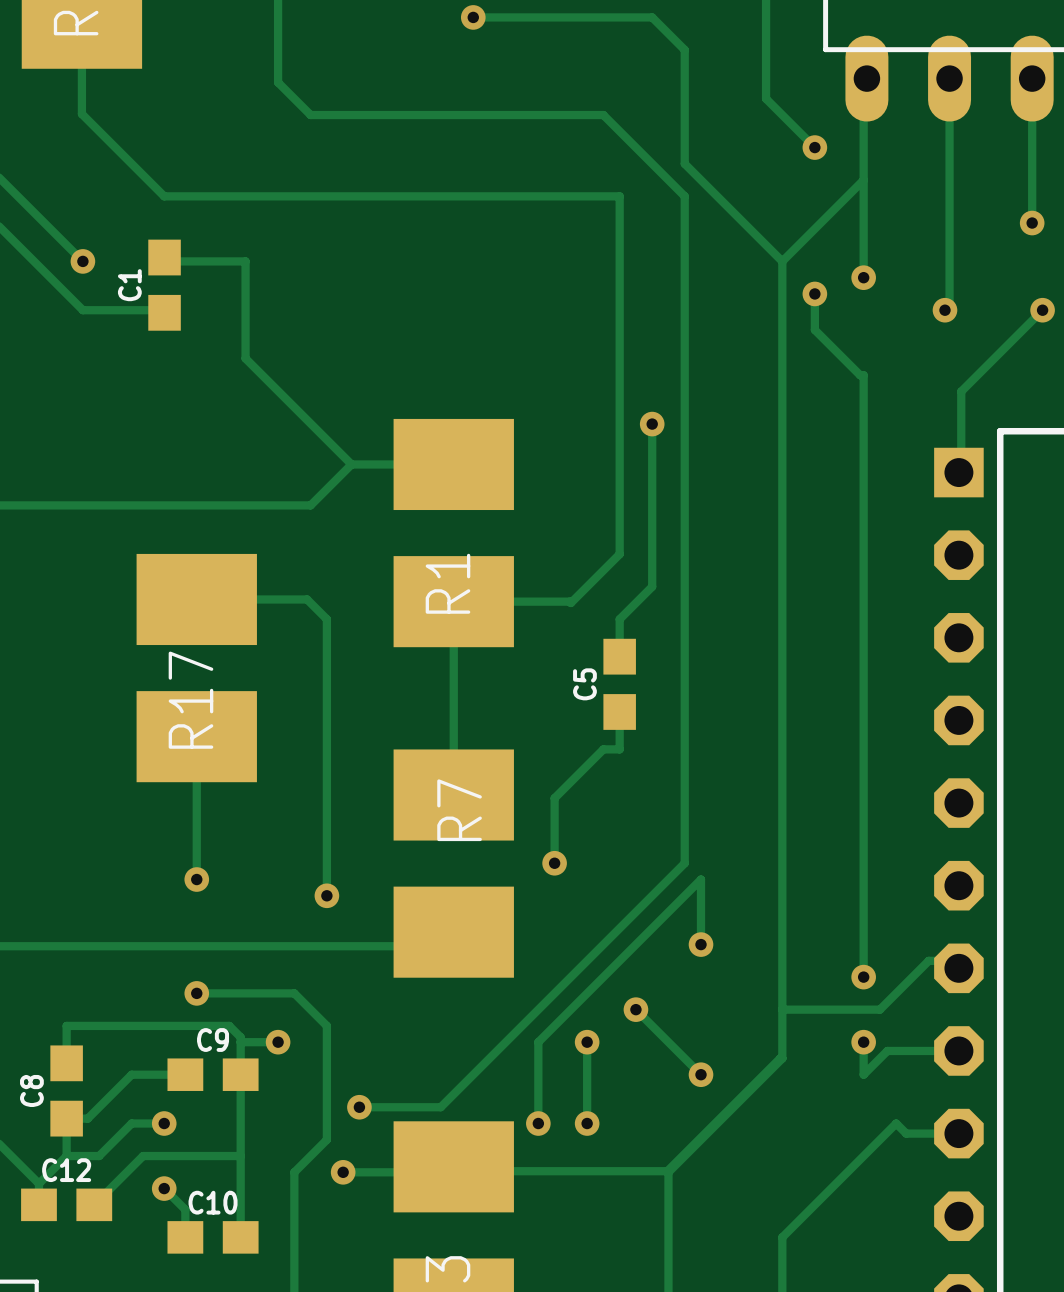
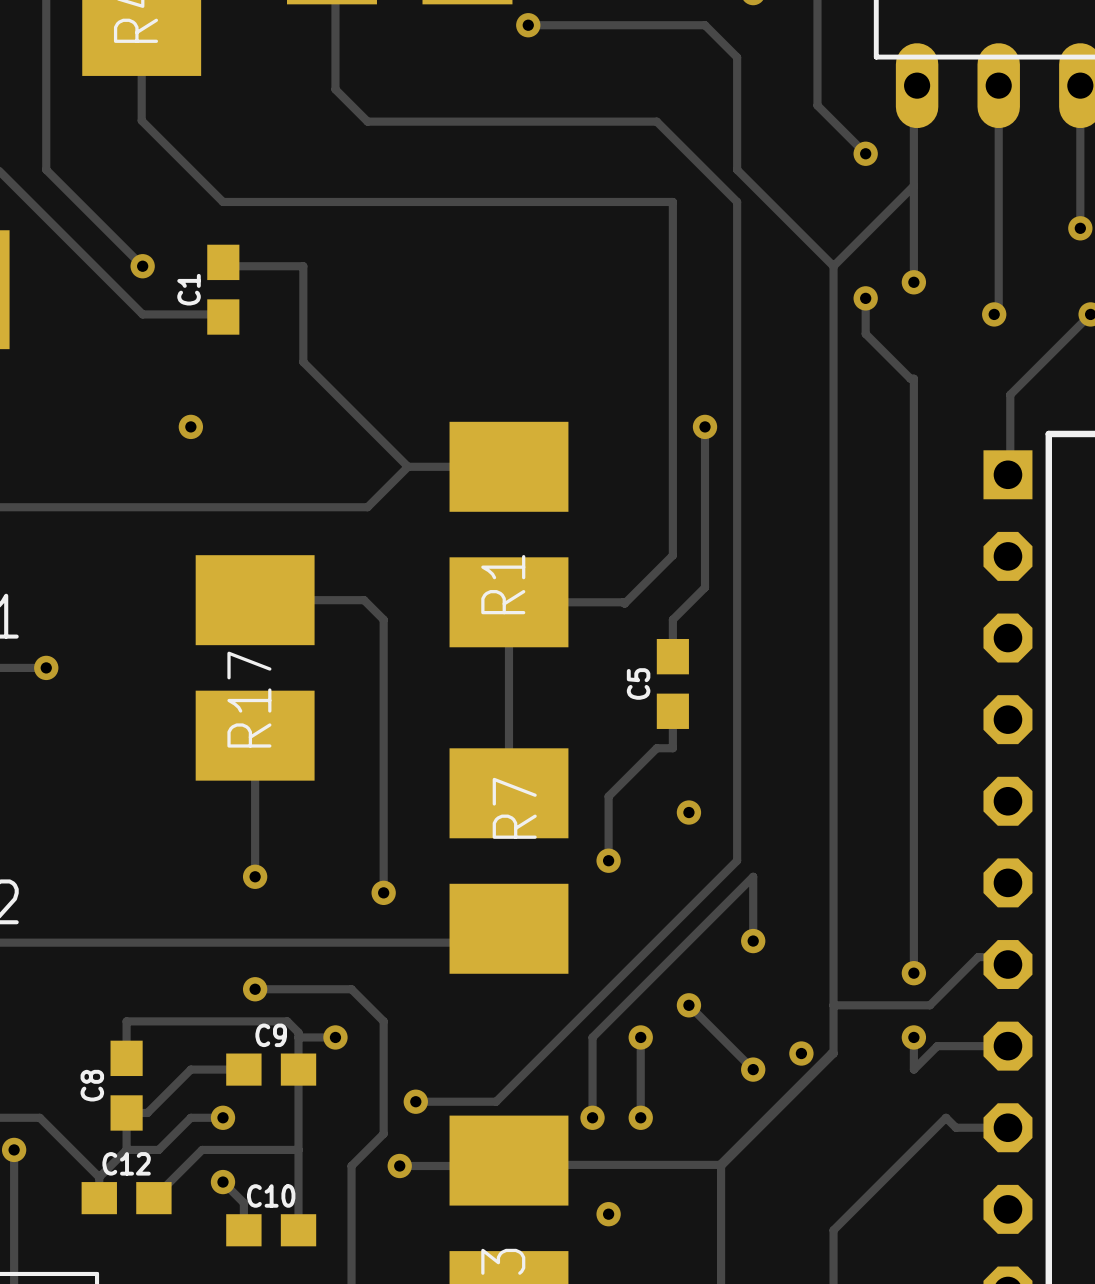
via: none -> (190, 426)
via: none -> (688, 812)
via: none -> (801, 1053)
via: none -> (608, 1214)

